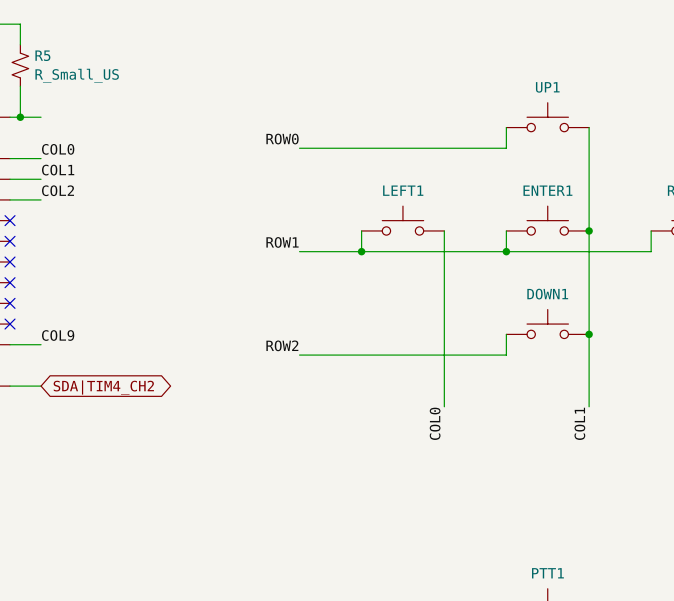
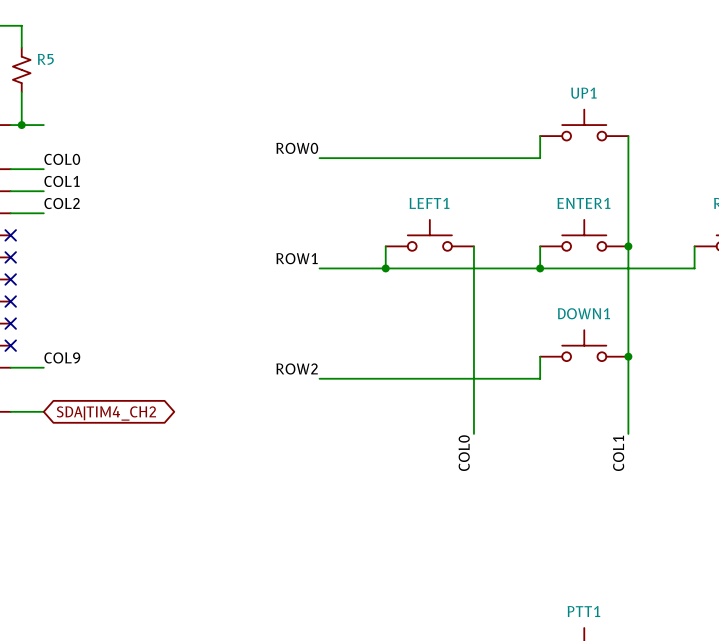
R5 value: R_Small_US (77, 75) -> none

